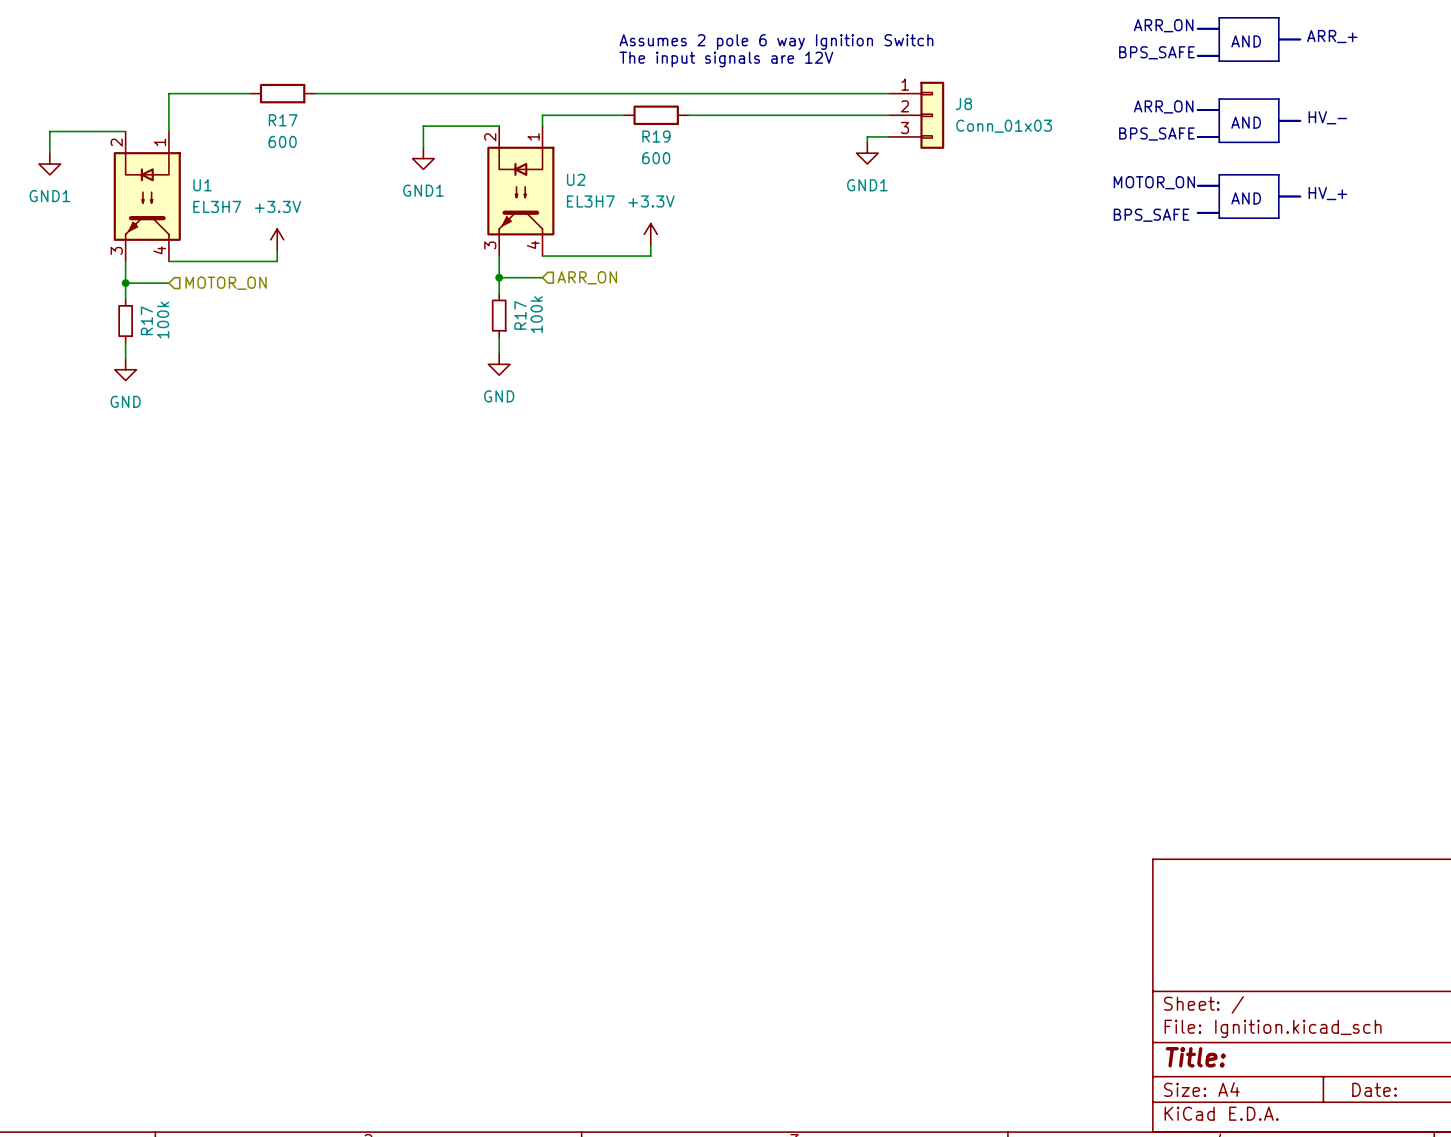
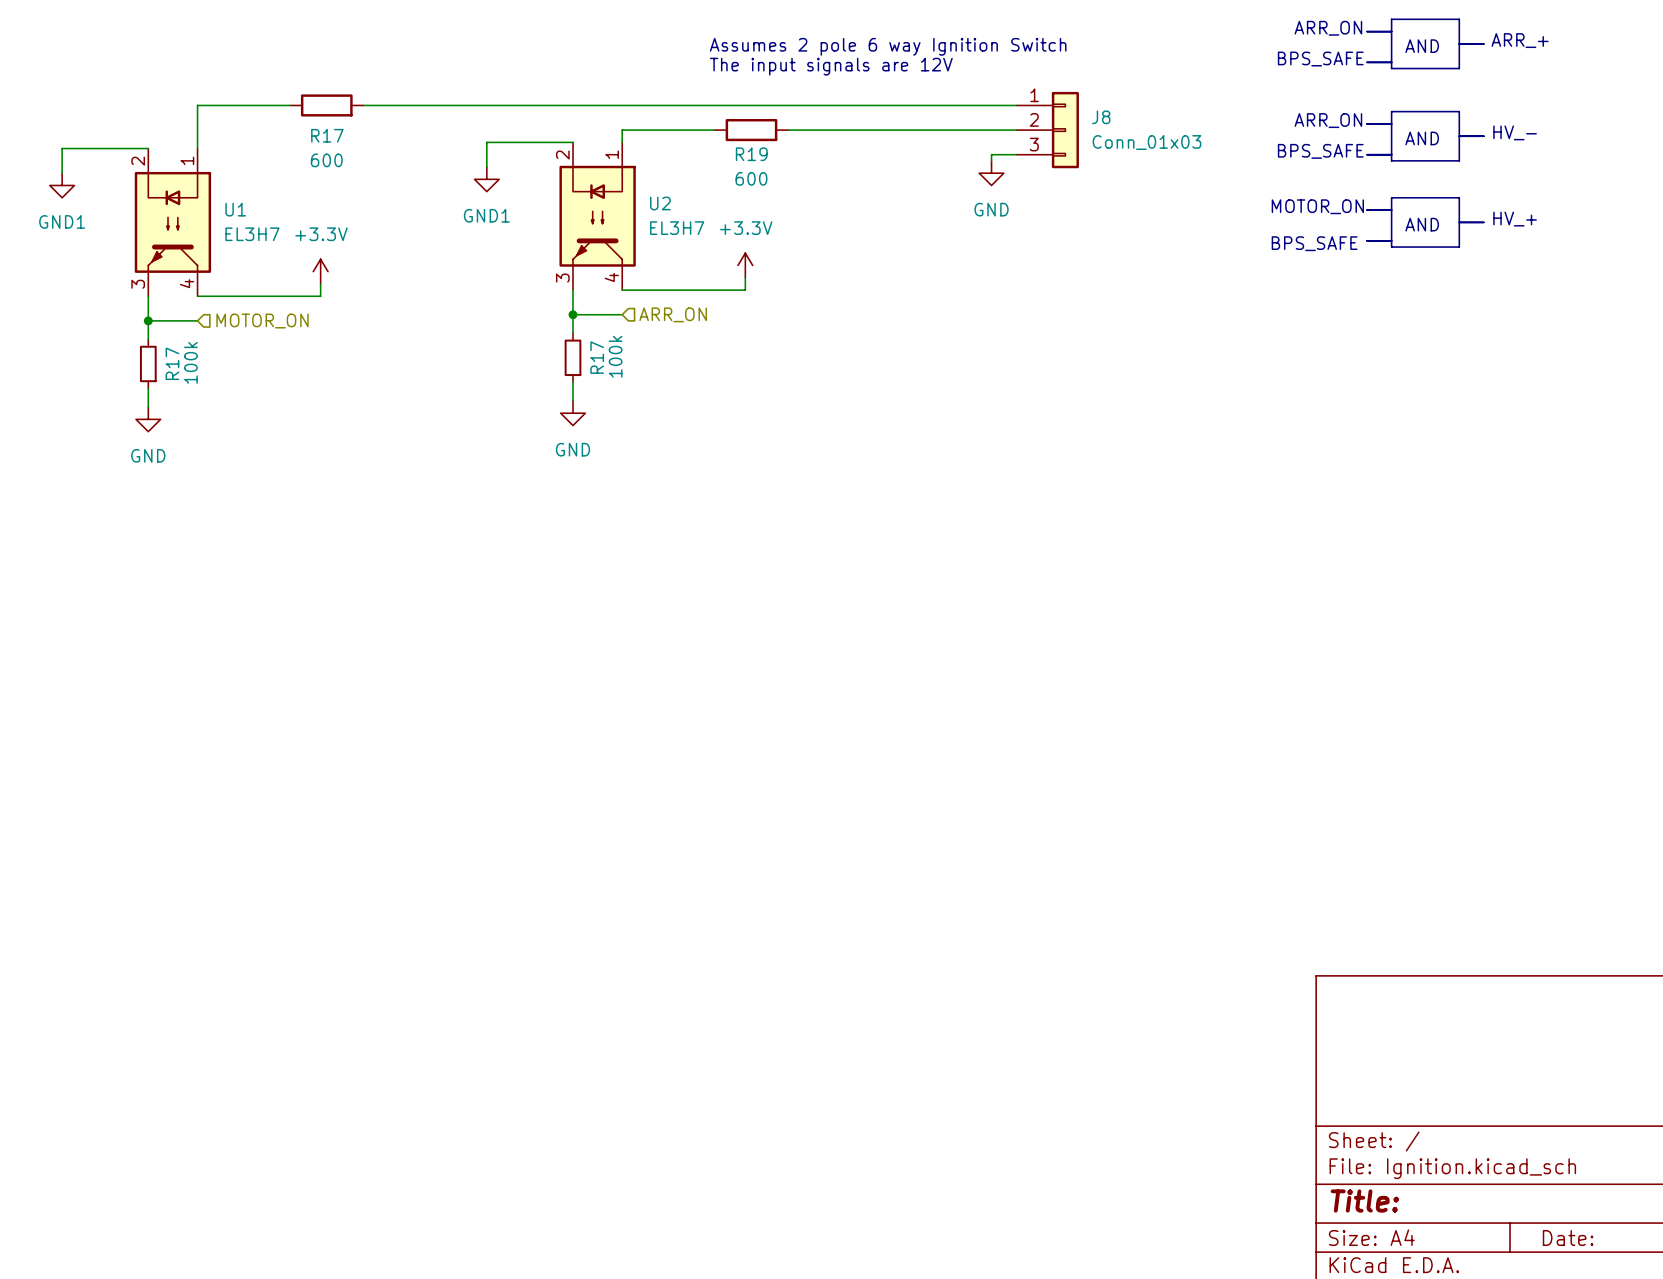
power symbol: GND1 (867, 153) -> GND (991, 173)

